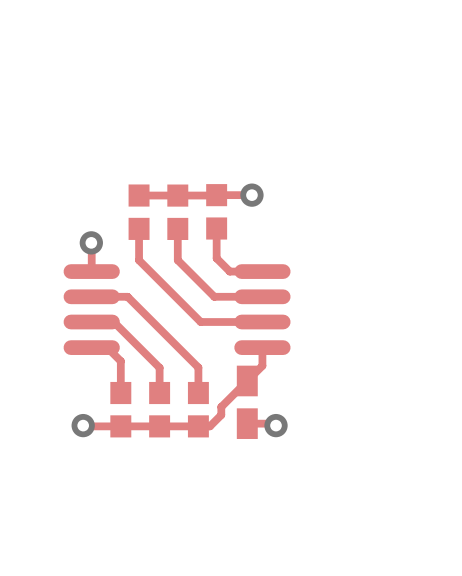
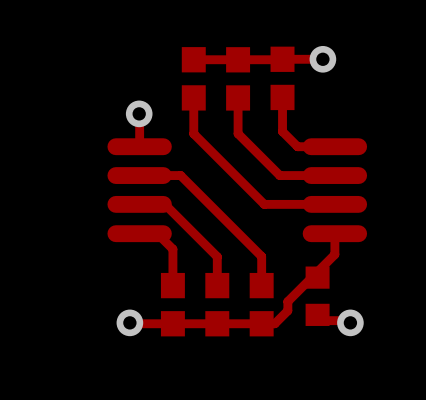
part footprint: [236, 365, 258, 439] -> [305, 266, 330, 326]

